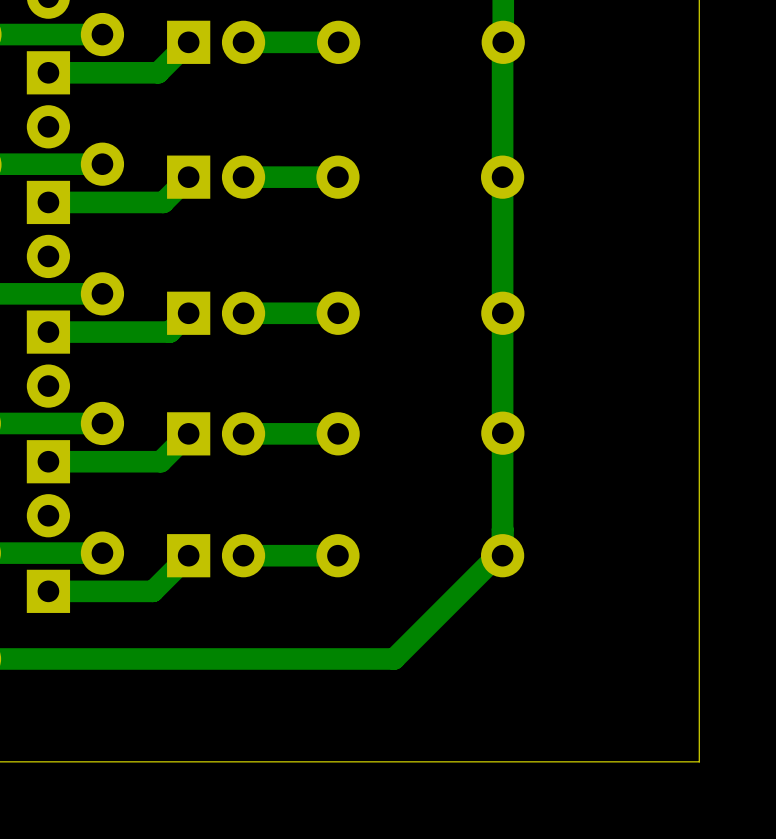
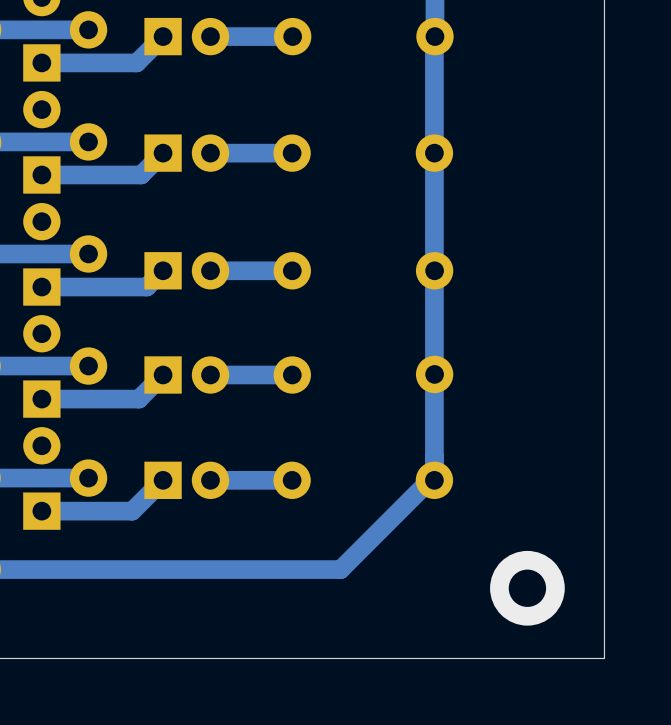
via: none -> (527, 588)

